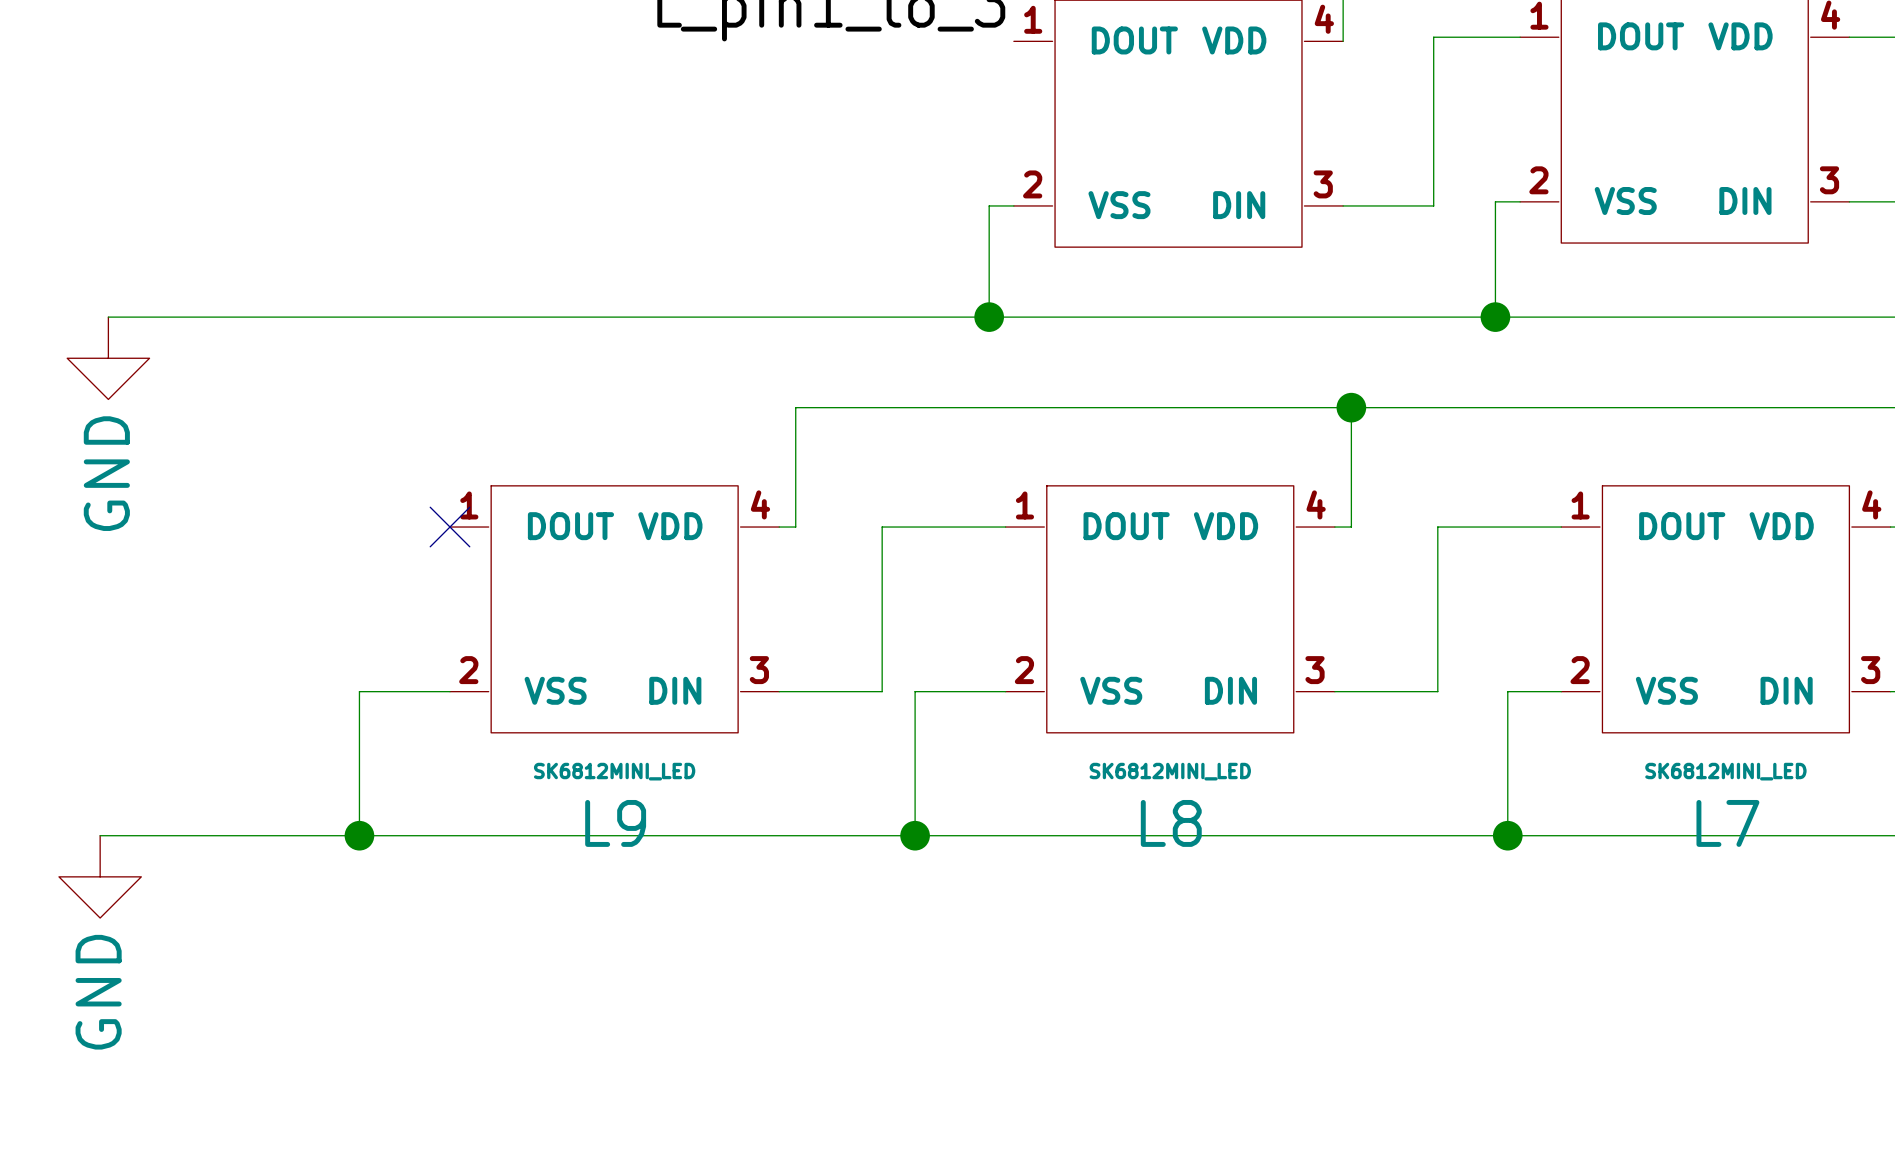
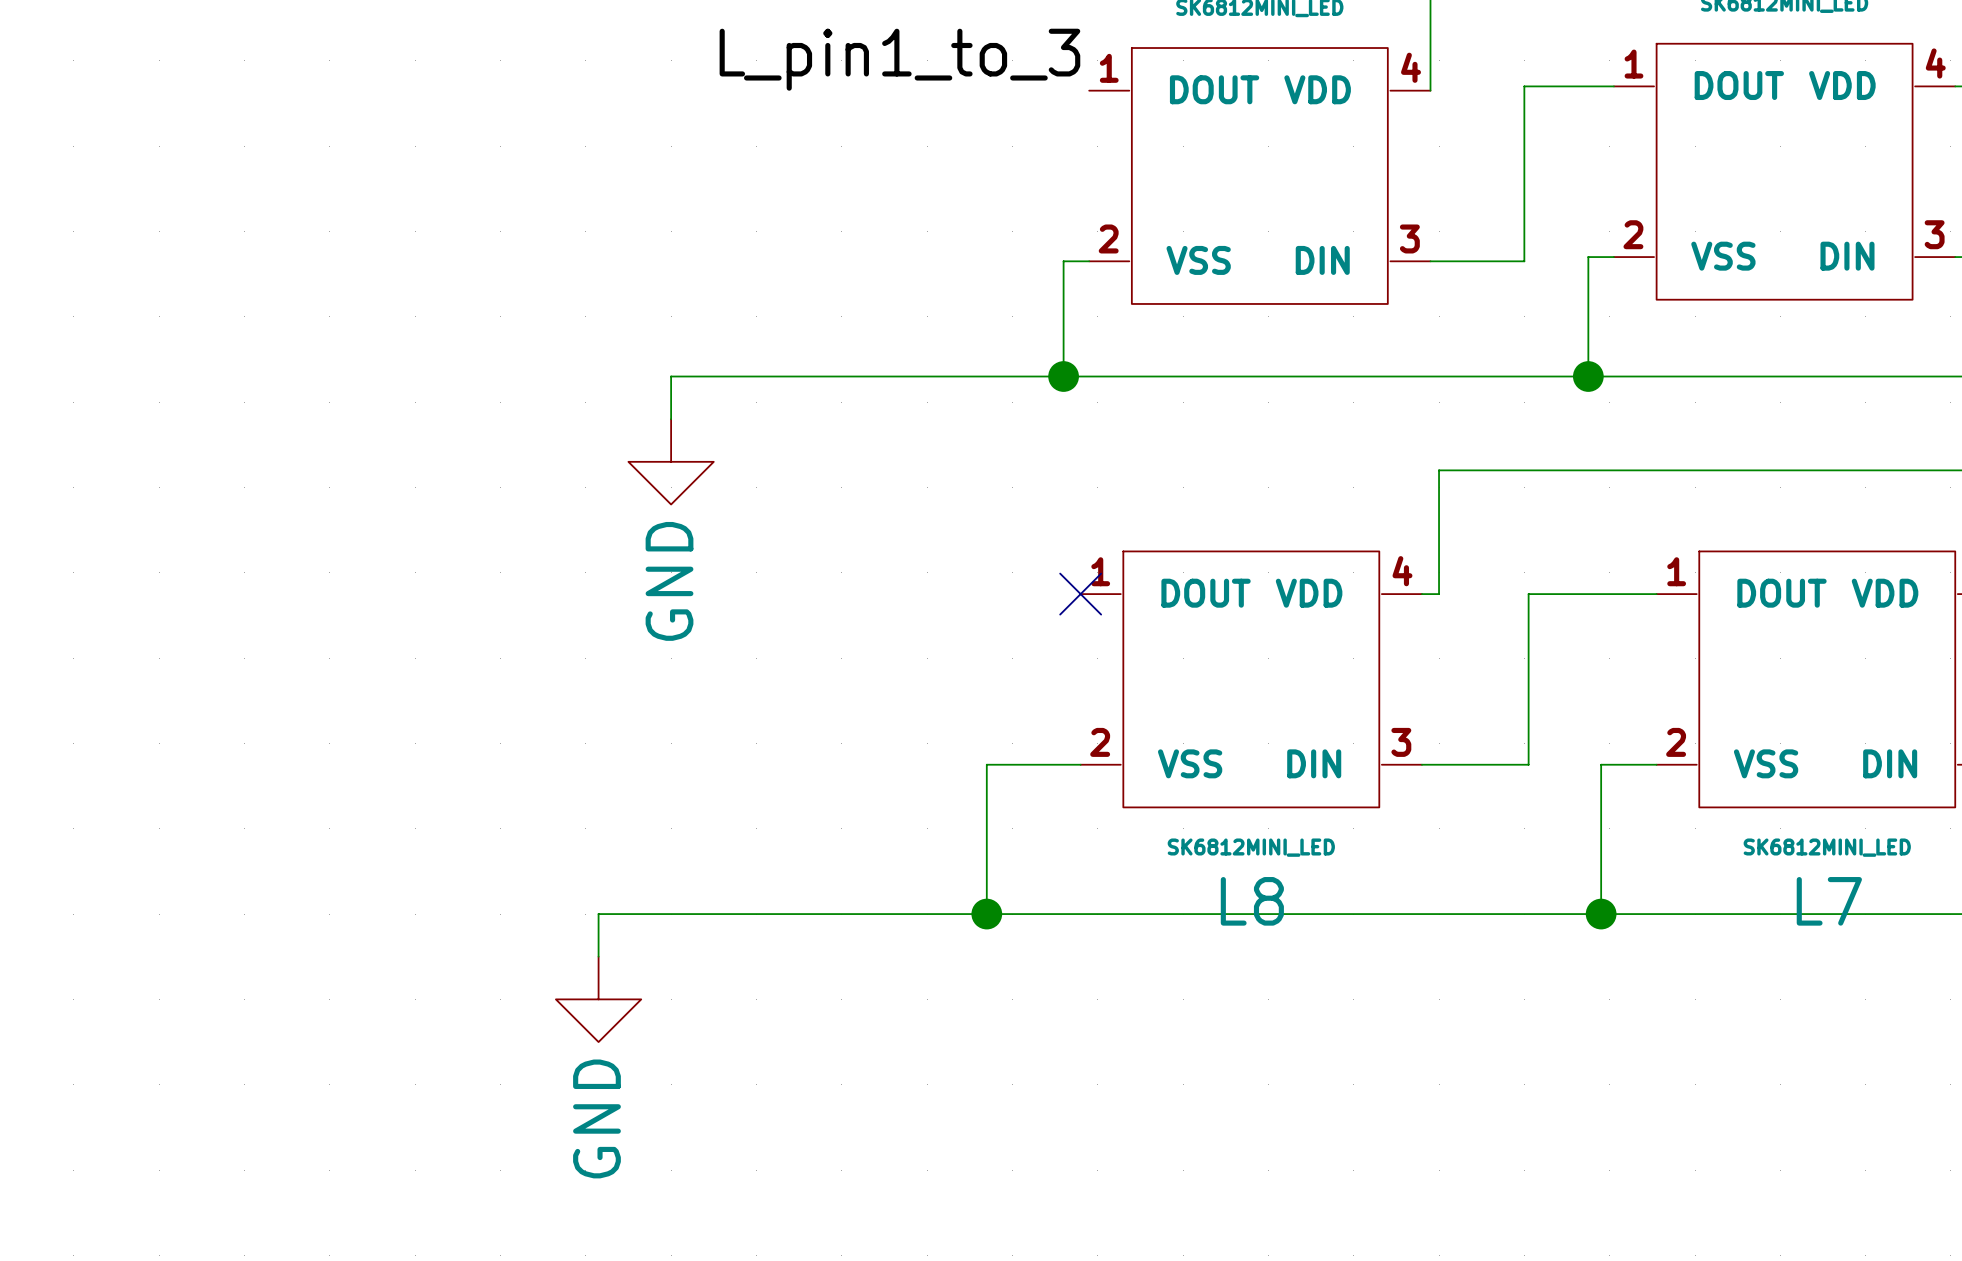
wire: (108, 317) (610, 317) -> (671, 419) (671, 376)
power symbol: GND (108, 358) -> none
power symbol: none -> GND (671, 461)
wire: (1351, 407) (795, 407) (795, 527) (779, 527) -> none
junction: (1351, 407) -> none
no-connect mark: (449, 527) -> none
wire: (1005, 527) (882, 527) (882, 691) (779, 691) -> none
no-connect mark: none -> (1080, 594)
L9: SK6812MINI_LED (614, 609) -> none
wire: (449, 691) (359, 691) (359, 835) -> none
wire: (100, 835) (540, 835) -> (598, 956) (598, 914)
junction: (359, 835) -> none
power symbol: GND (100, 876) -> none
power symbol: none -> GND (598, 999)

